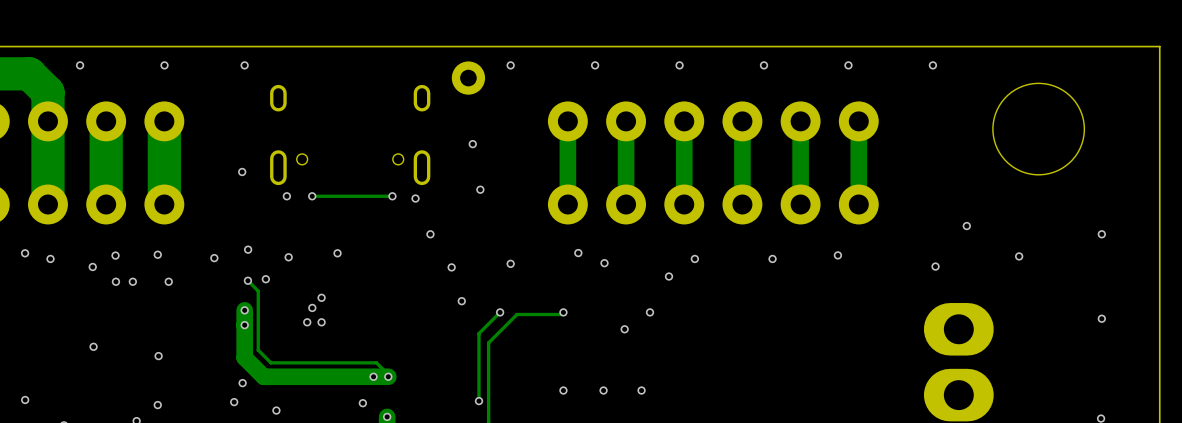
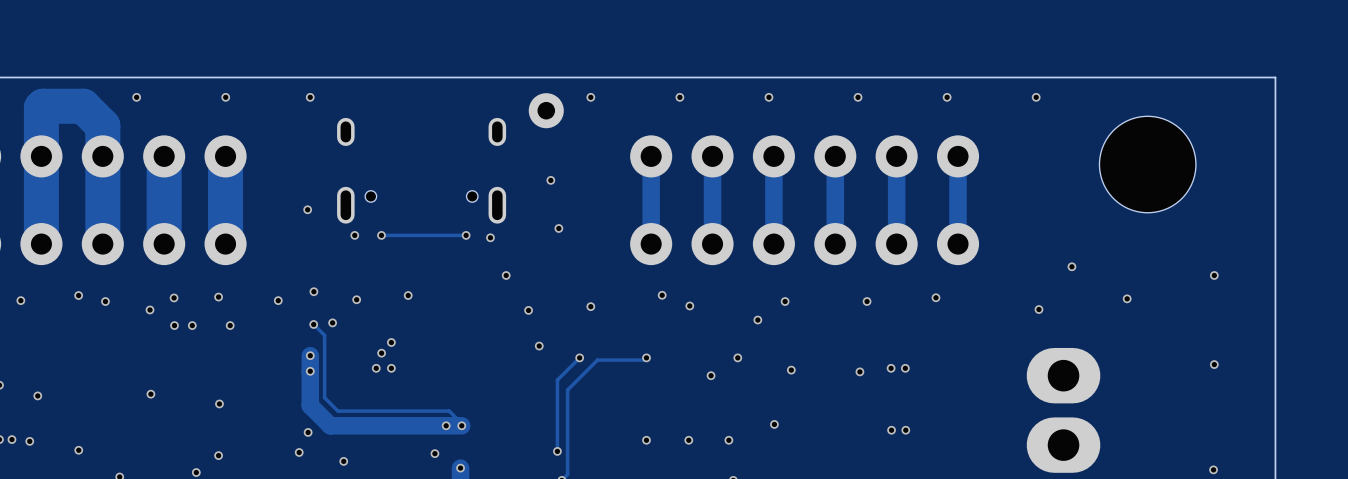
via: none -> (891, 368)
via: none -> (905, 368)
via: none -> (791, 370)
via: none -> (859, 371)
via: none -> (774, 424)
via: none -> (891, 430)
via: none -> (905, 430)

